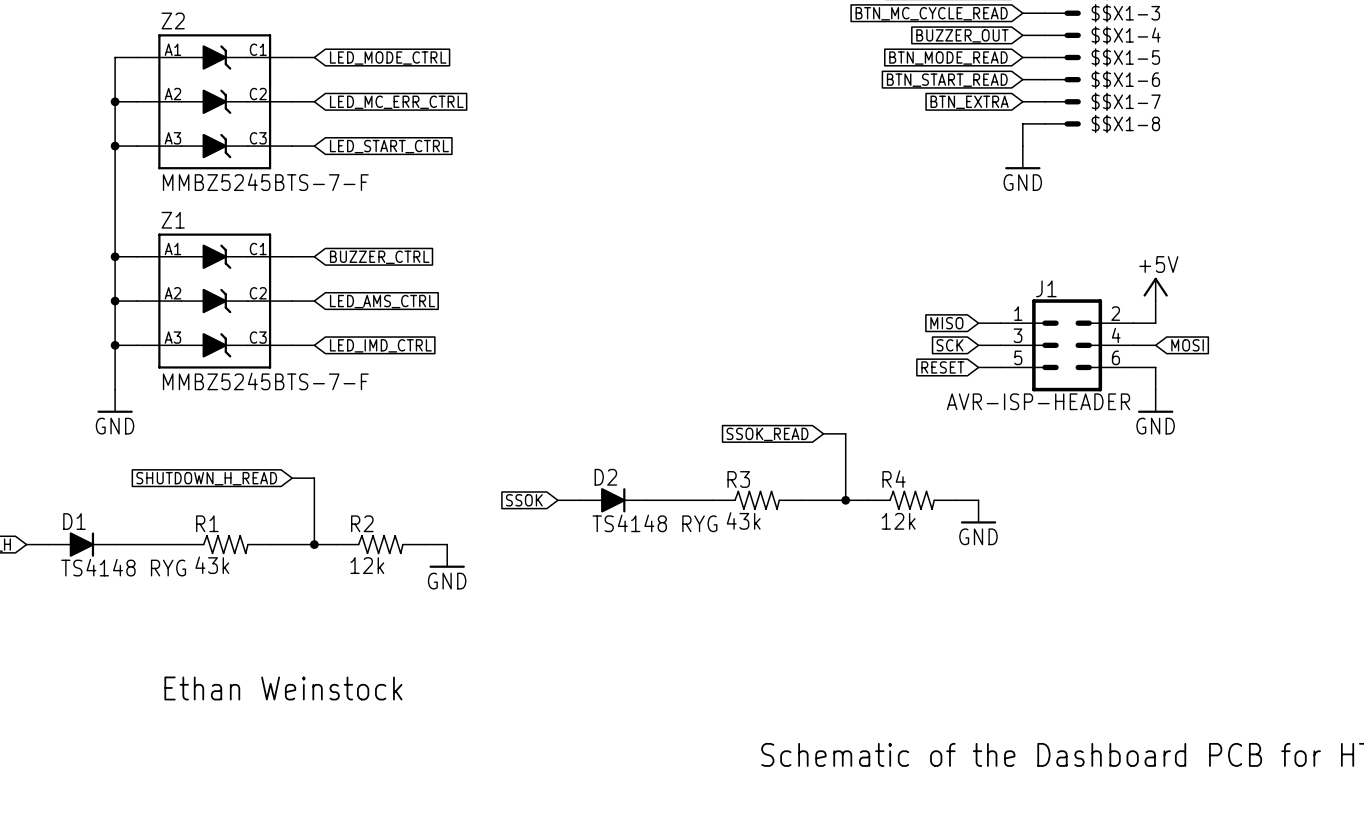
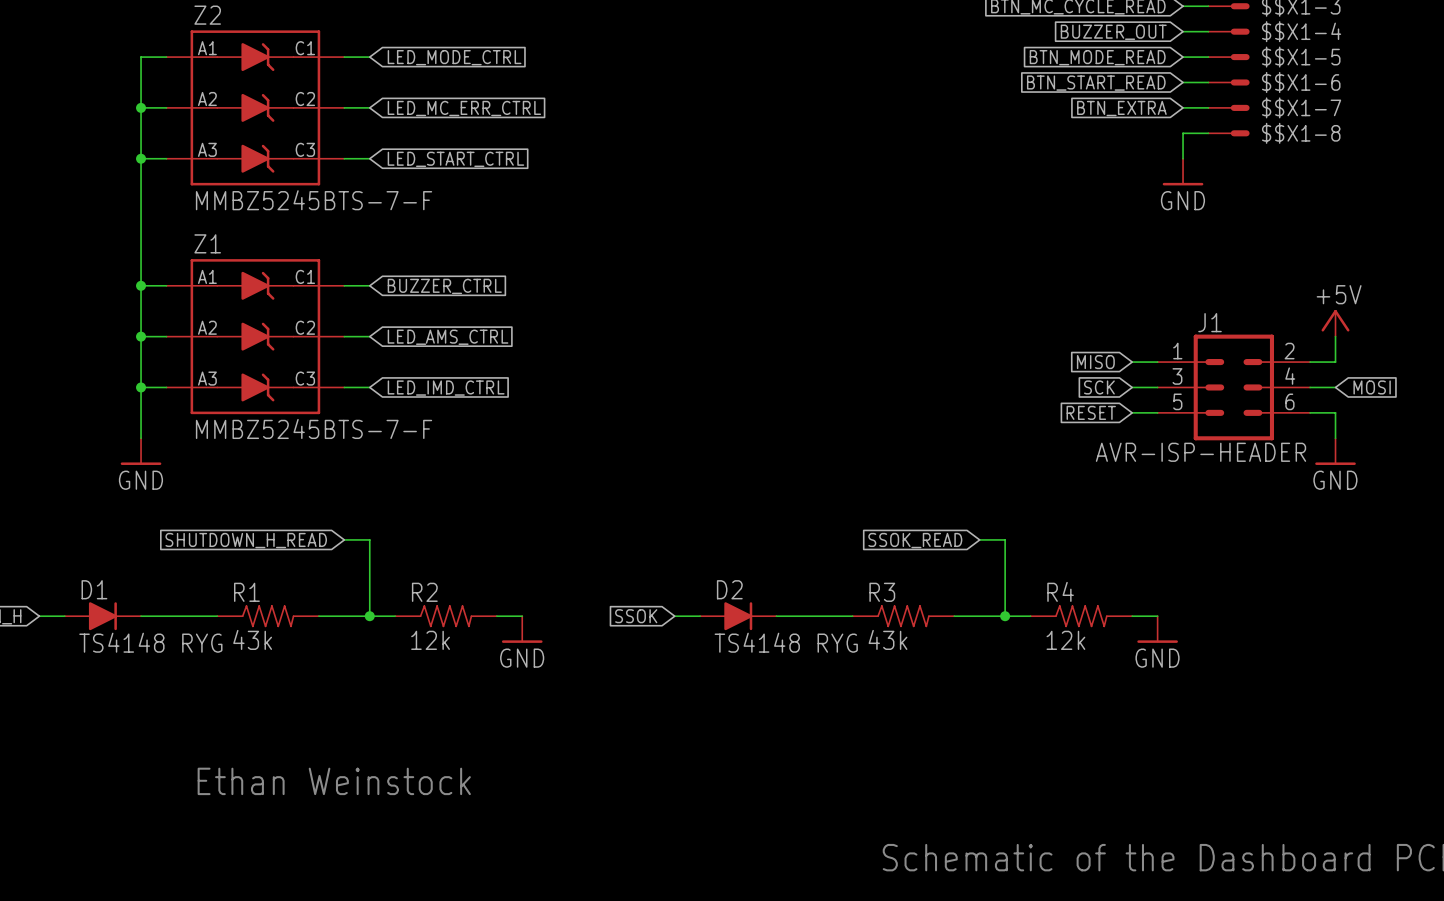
wire: (823, 433) (845, 433) (845, 500) -> (979, 539) (1005, 539) (1005, 616)
global label position: SSOK_READ (767, 434) -> SSOK_READ (915, 540)
global label position: SSOK (524, 500) -> SSOK (636, 616)
wire: (557, 500) (580, 500) -> (674, 616) (700, 616)
D2 position: (613, 500) -> (738, 616)
wire: (646, 500) (712, 500) -> (776, 616) (852, 616)
R3 position: (757, 500) -> (903, 616)
wire: (801, 500) (867, 500) -> (954, 616) (1030, 616)
junction position: (845, 500) -> (1005, 616)
R4 position: (912, 500) -> (1081, 616)
wire: (956, 500) (978, 500) -> (1132, 616) (1157, 616)
power symbol position: GND (978, 511) -> GND (1157, 629)

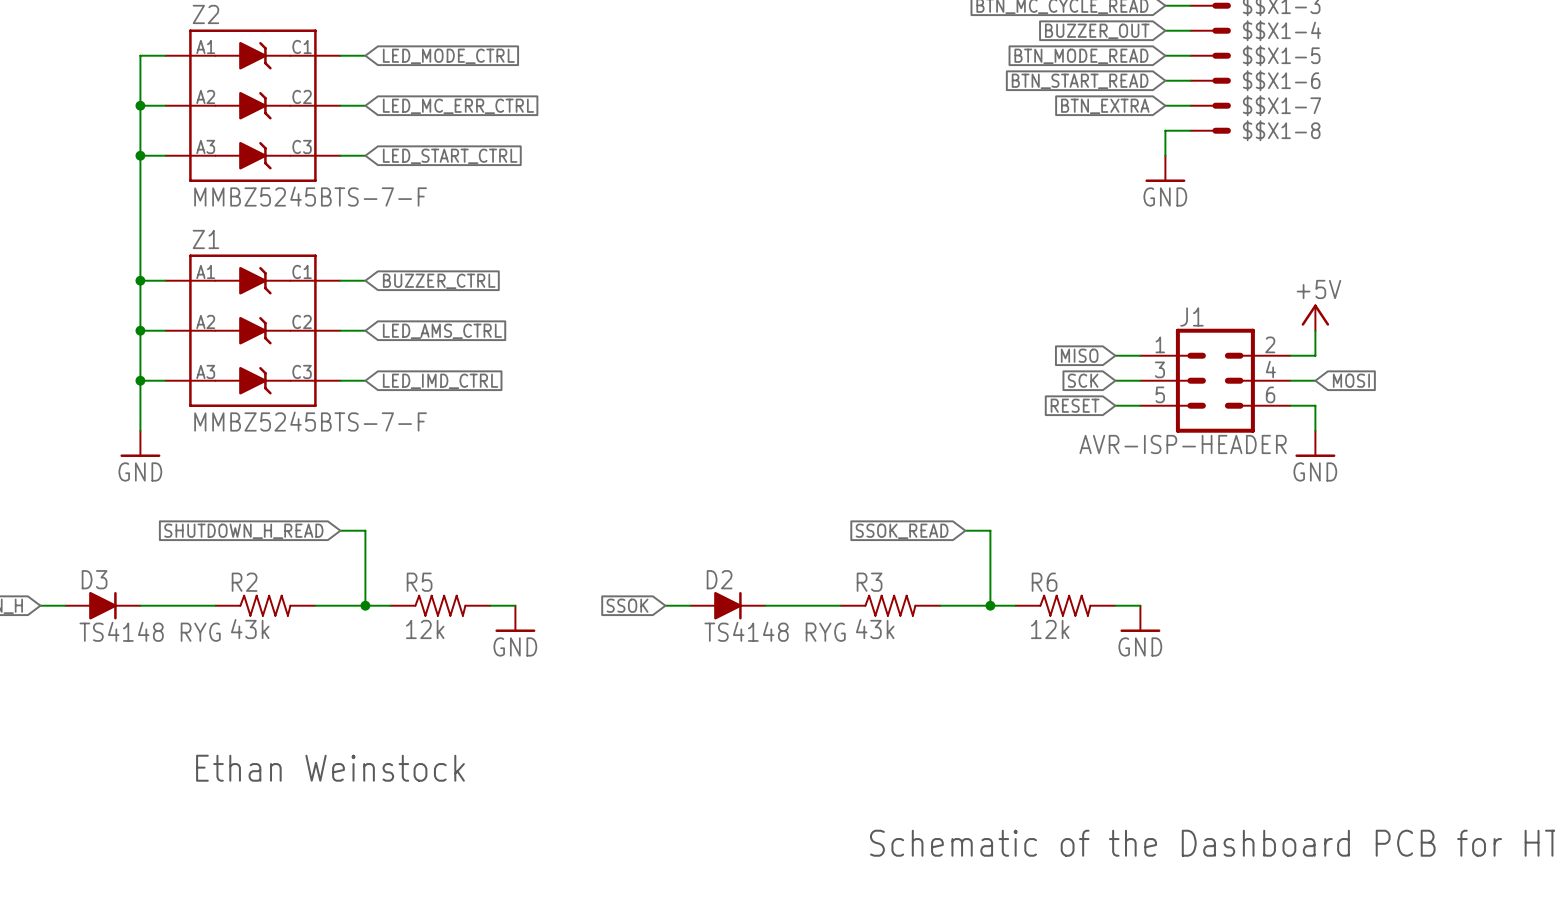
D1 name: D1 (94, 589) -> D3 (94, 579)
R4 name: R4 (1060, 591) -> R6 (1044, 582)
R1 name: R1 (246, 592) -> R2 (244, 582)
R2 name: R2 (424, 592) -> R5 (419, 582)

